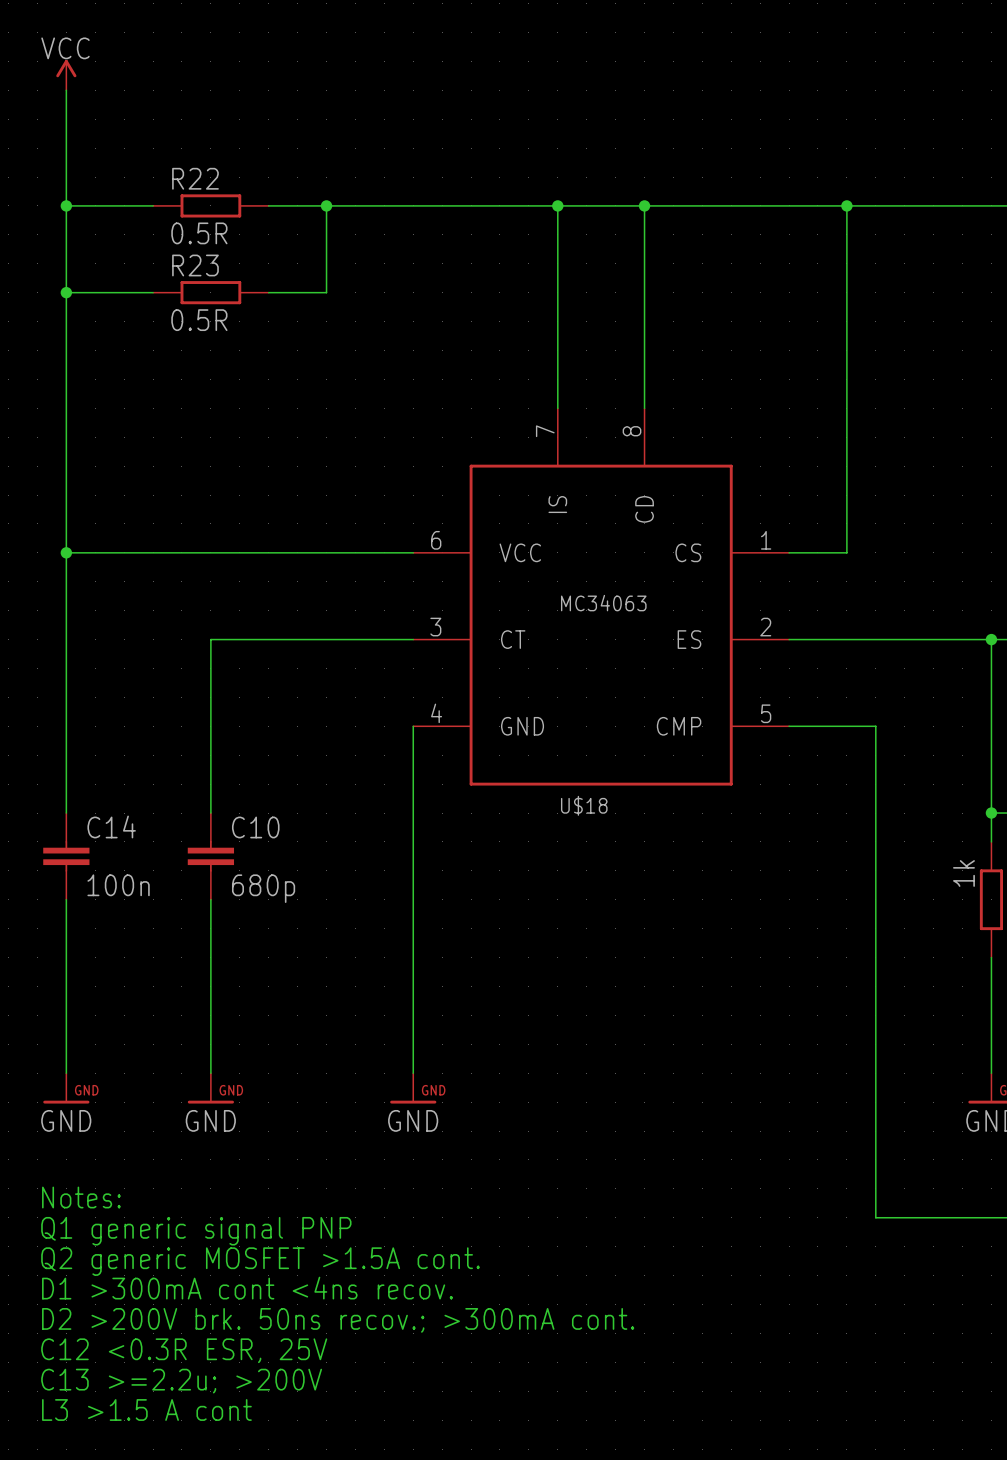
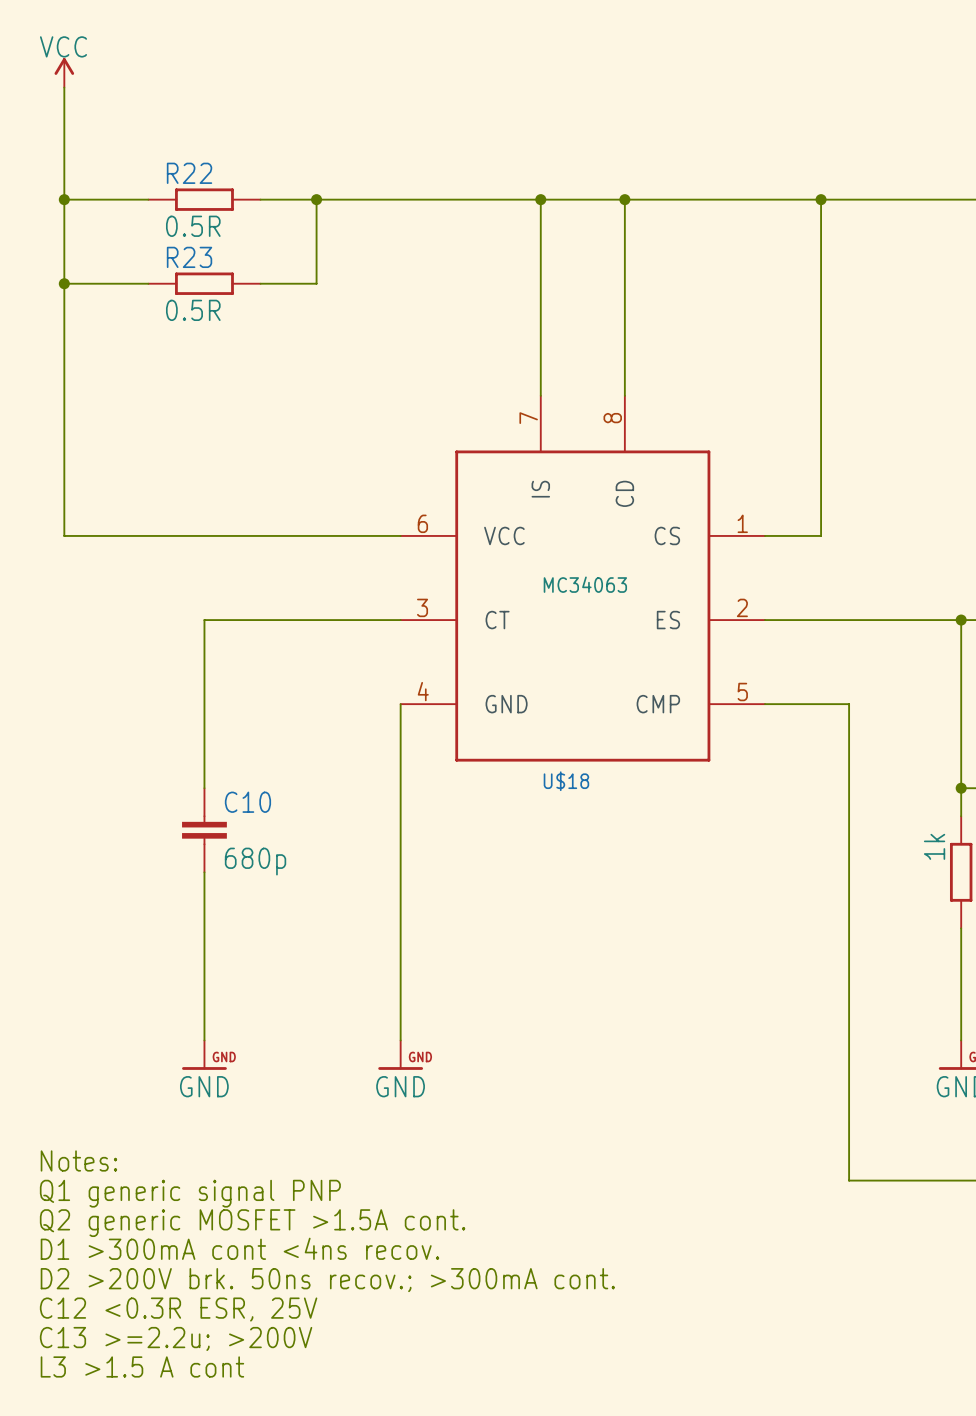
wire: (66, 552) (66, 813) -> none
junction: (66, 552) -> none
C14: 100n (66, 856) -> none
wire: (66, 899) (66, 1073) -> none
power symbol: GND (66, 1088) -> none

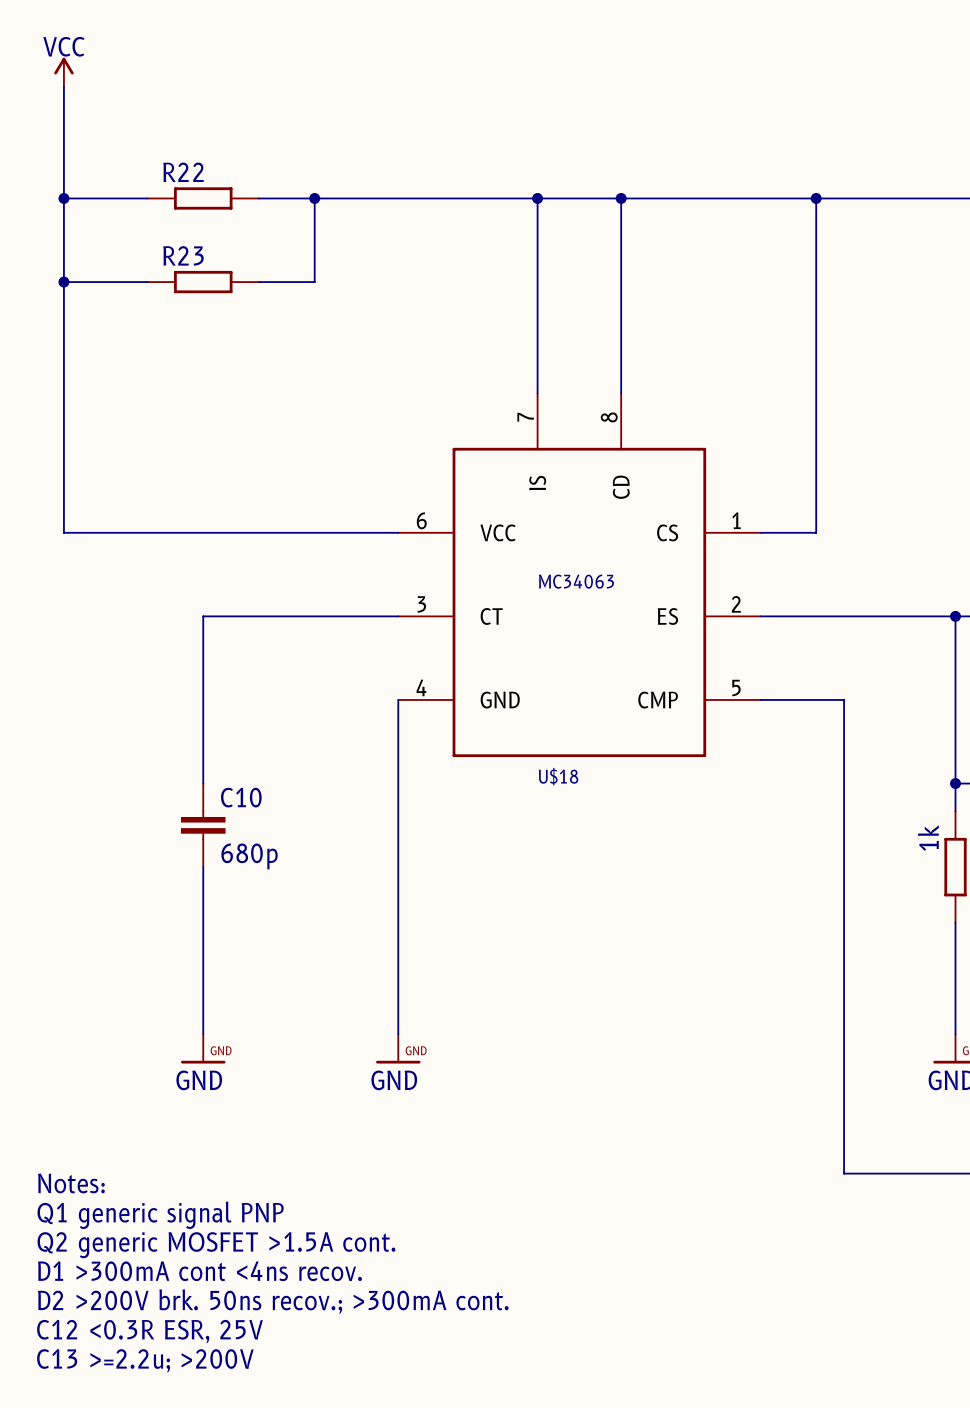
R22 value: 0.5R (193, 226) -> none
R23 value: 0.5R (193, 310) -> none
text: Notes: (78, 1160) -> none
text: Q1 generic signal PNP (190, 1193) -> Notes: (71, 1183)
text: Q2 generic MOSFET >1.5A cont. (252, 1223) -> Q1 generic signal PNP (160, 1215)
text: D1 >300mA cont <4ns recov. (239, 1248) -> Q2 generic MOSFET >1.5A cont. (216, 1245)
text: D2 >200V brk. 50ns recov.; >300mA cont. (327, 1280) -> D1 >300mA cont <4ns recov. (199, 1271)
text: C12 <0.3R ESR, 25V (178, 1309) -> D2 >200V brk. 50ns recov.; >300mA cont. (273, 1301)
text: C13 >=2.2u; >200V (176, 1338) -> C12 <0.3R ESR, 25V (150, 1331)
text: L3 >1.5 A cont (142, 1366) -> C13 >=2.2u; >200V (145, 1360)

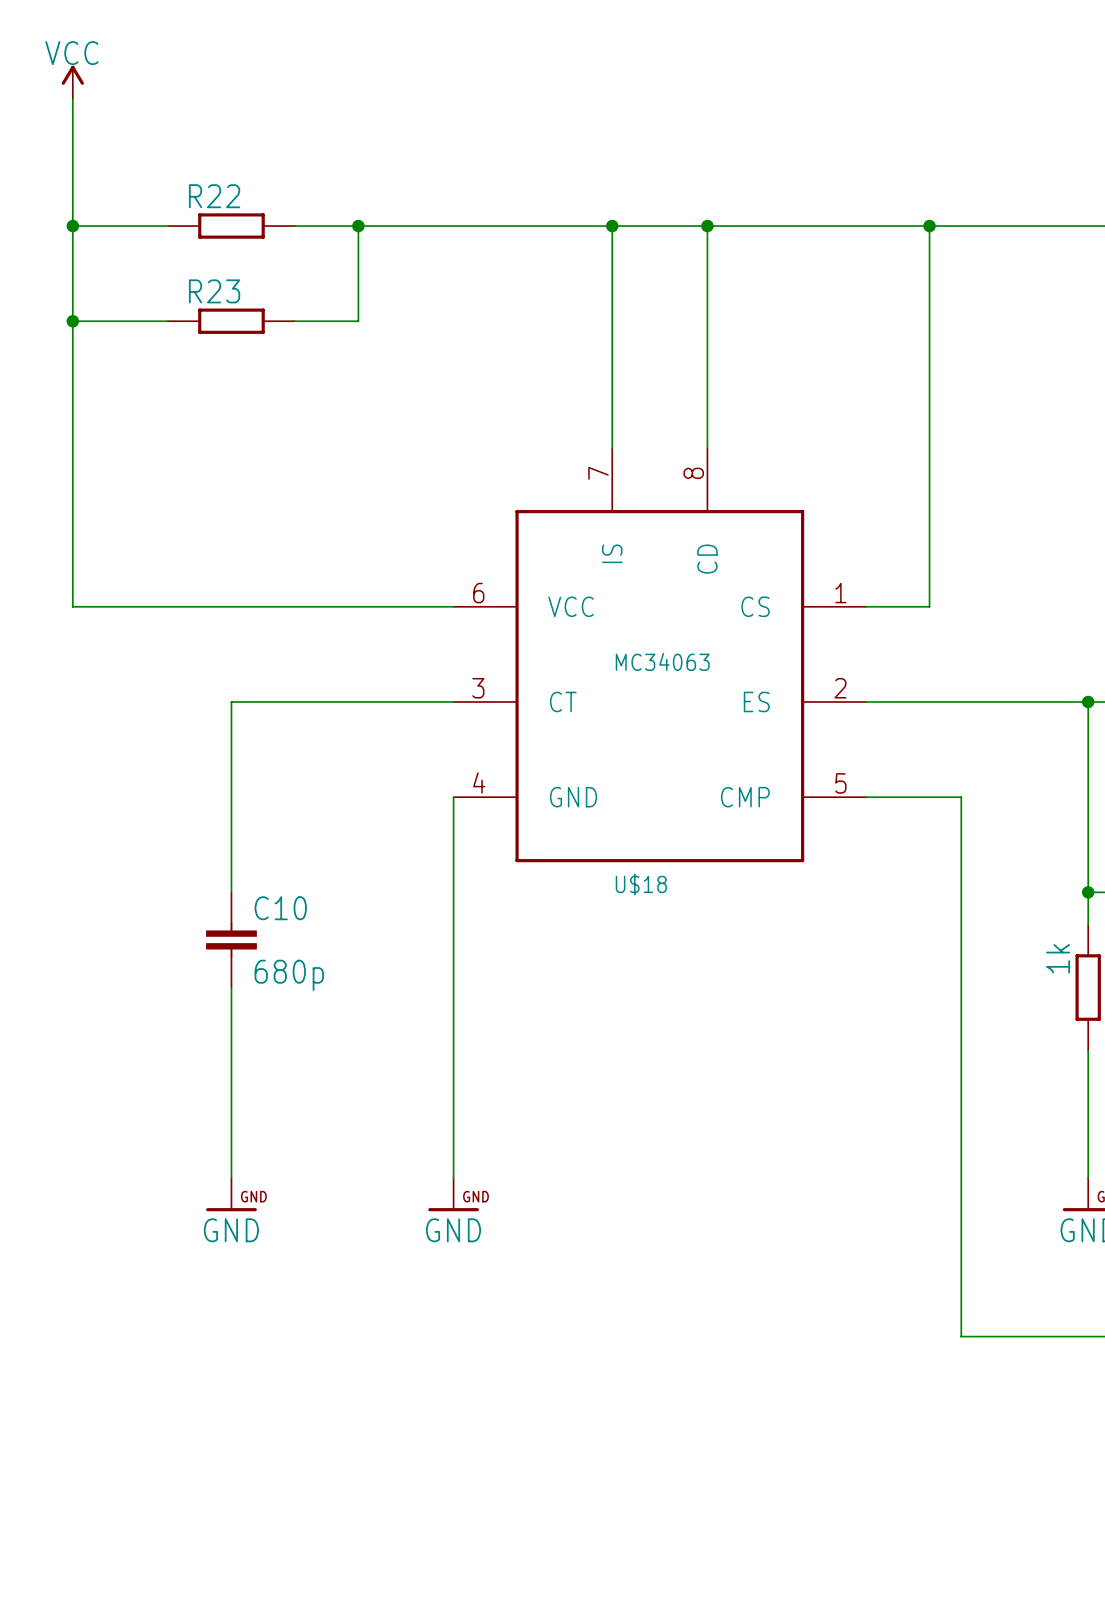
text: Notes: (71, 1183) -> none
text: Q1 generic signal PNP (160, 1215) -> none
text: Q2 generic MOSFET >1.5A cont. (216, 1245) -> none
text: D1 >300mA cont <4ns recov. (199, 1271) -> none
text: D2 >200V brk. 50ns recov.; >300mA cont. (273, 1301) -> none
text: C12 <0.3R ESR, 25V (150, 1331) -> none
text: C13 >=2.2u; >200V (145, 1360) -> none

